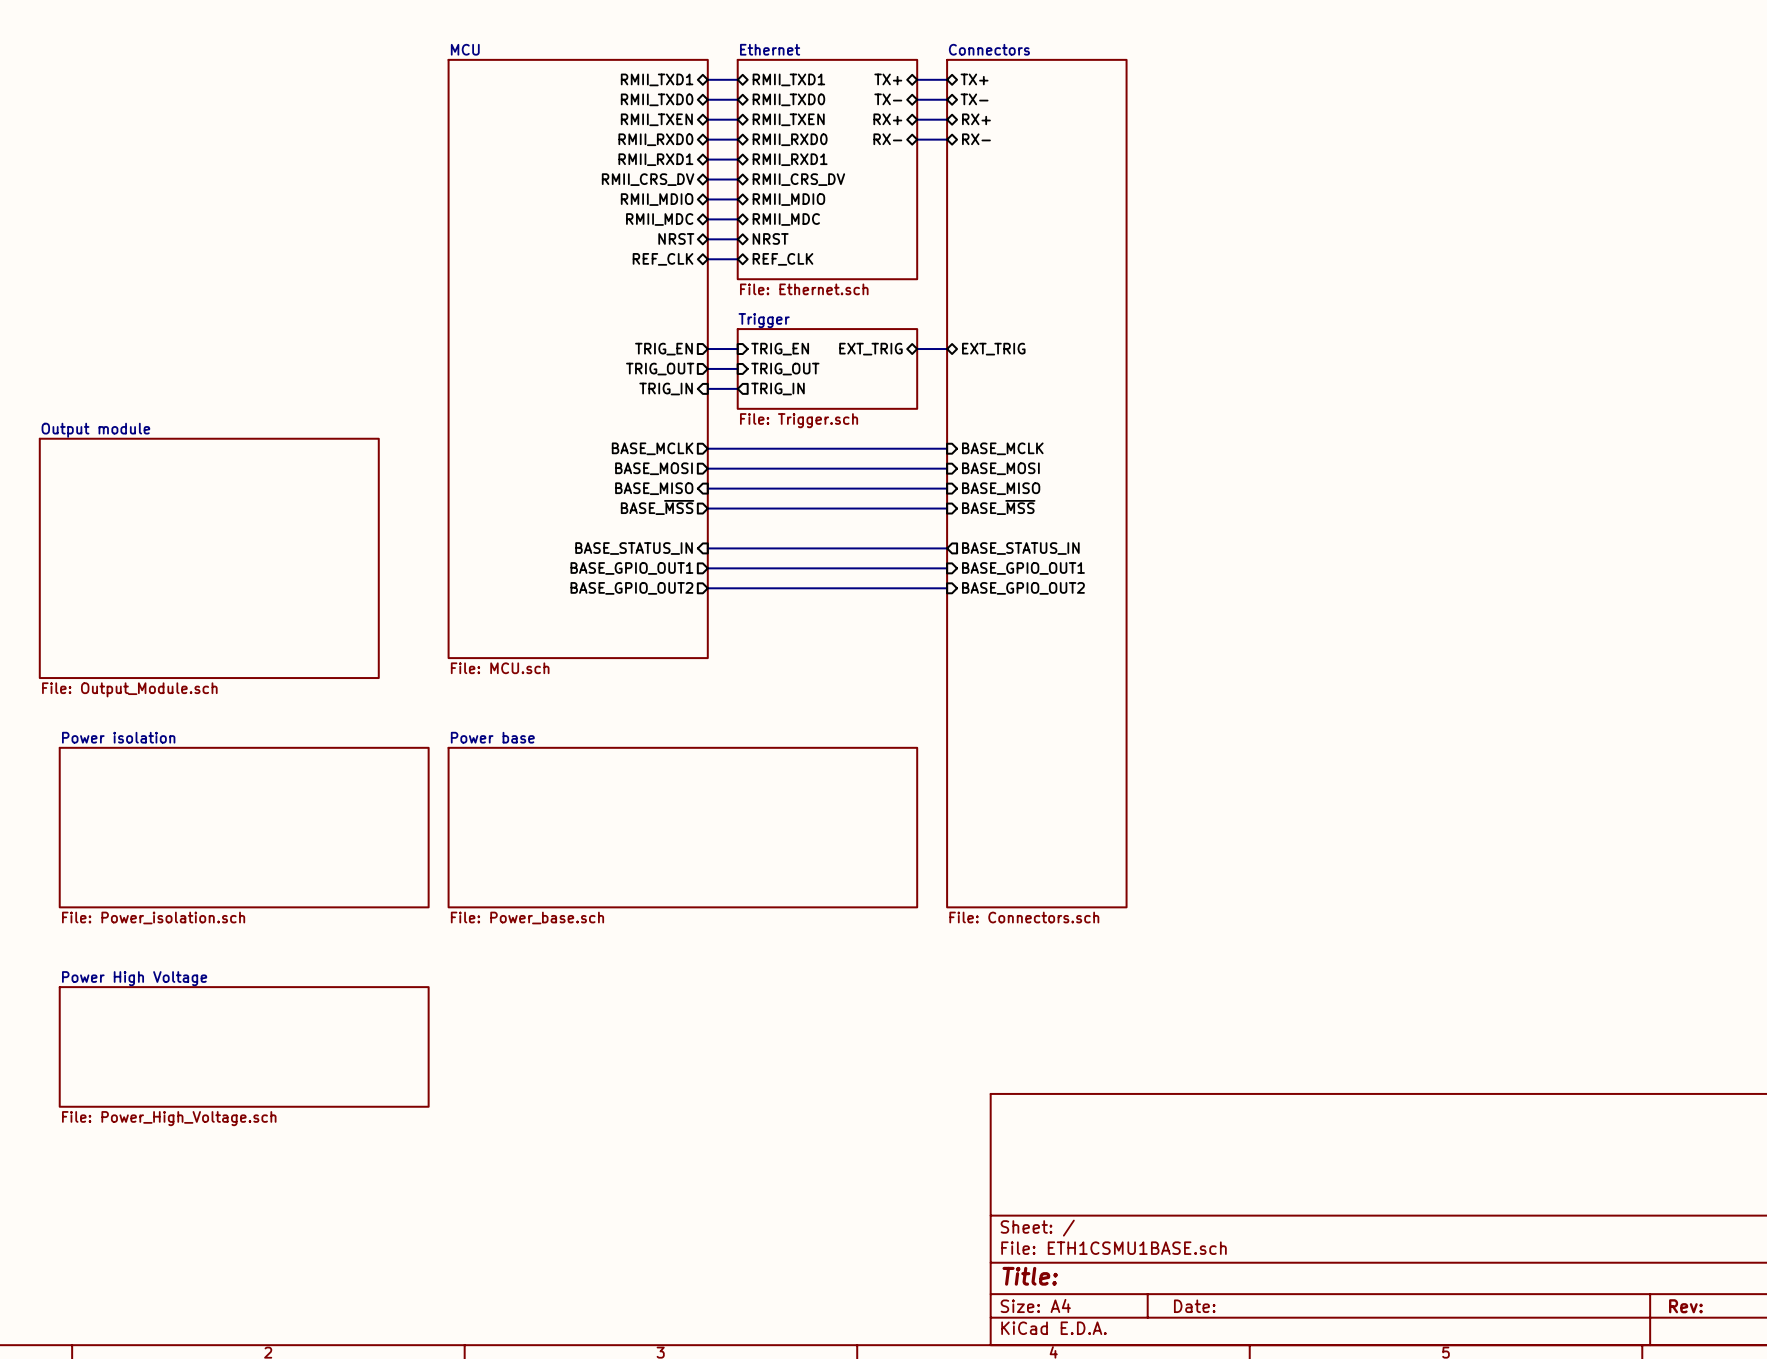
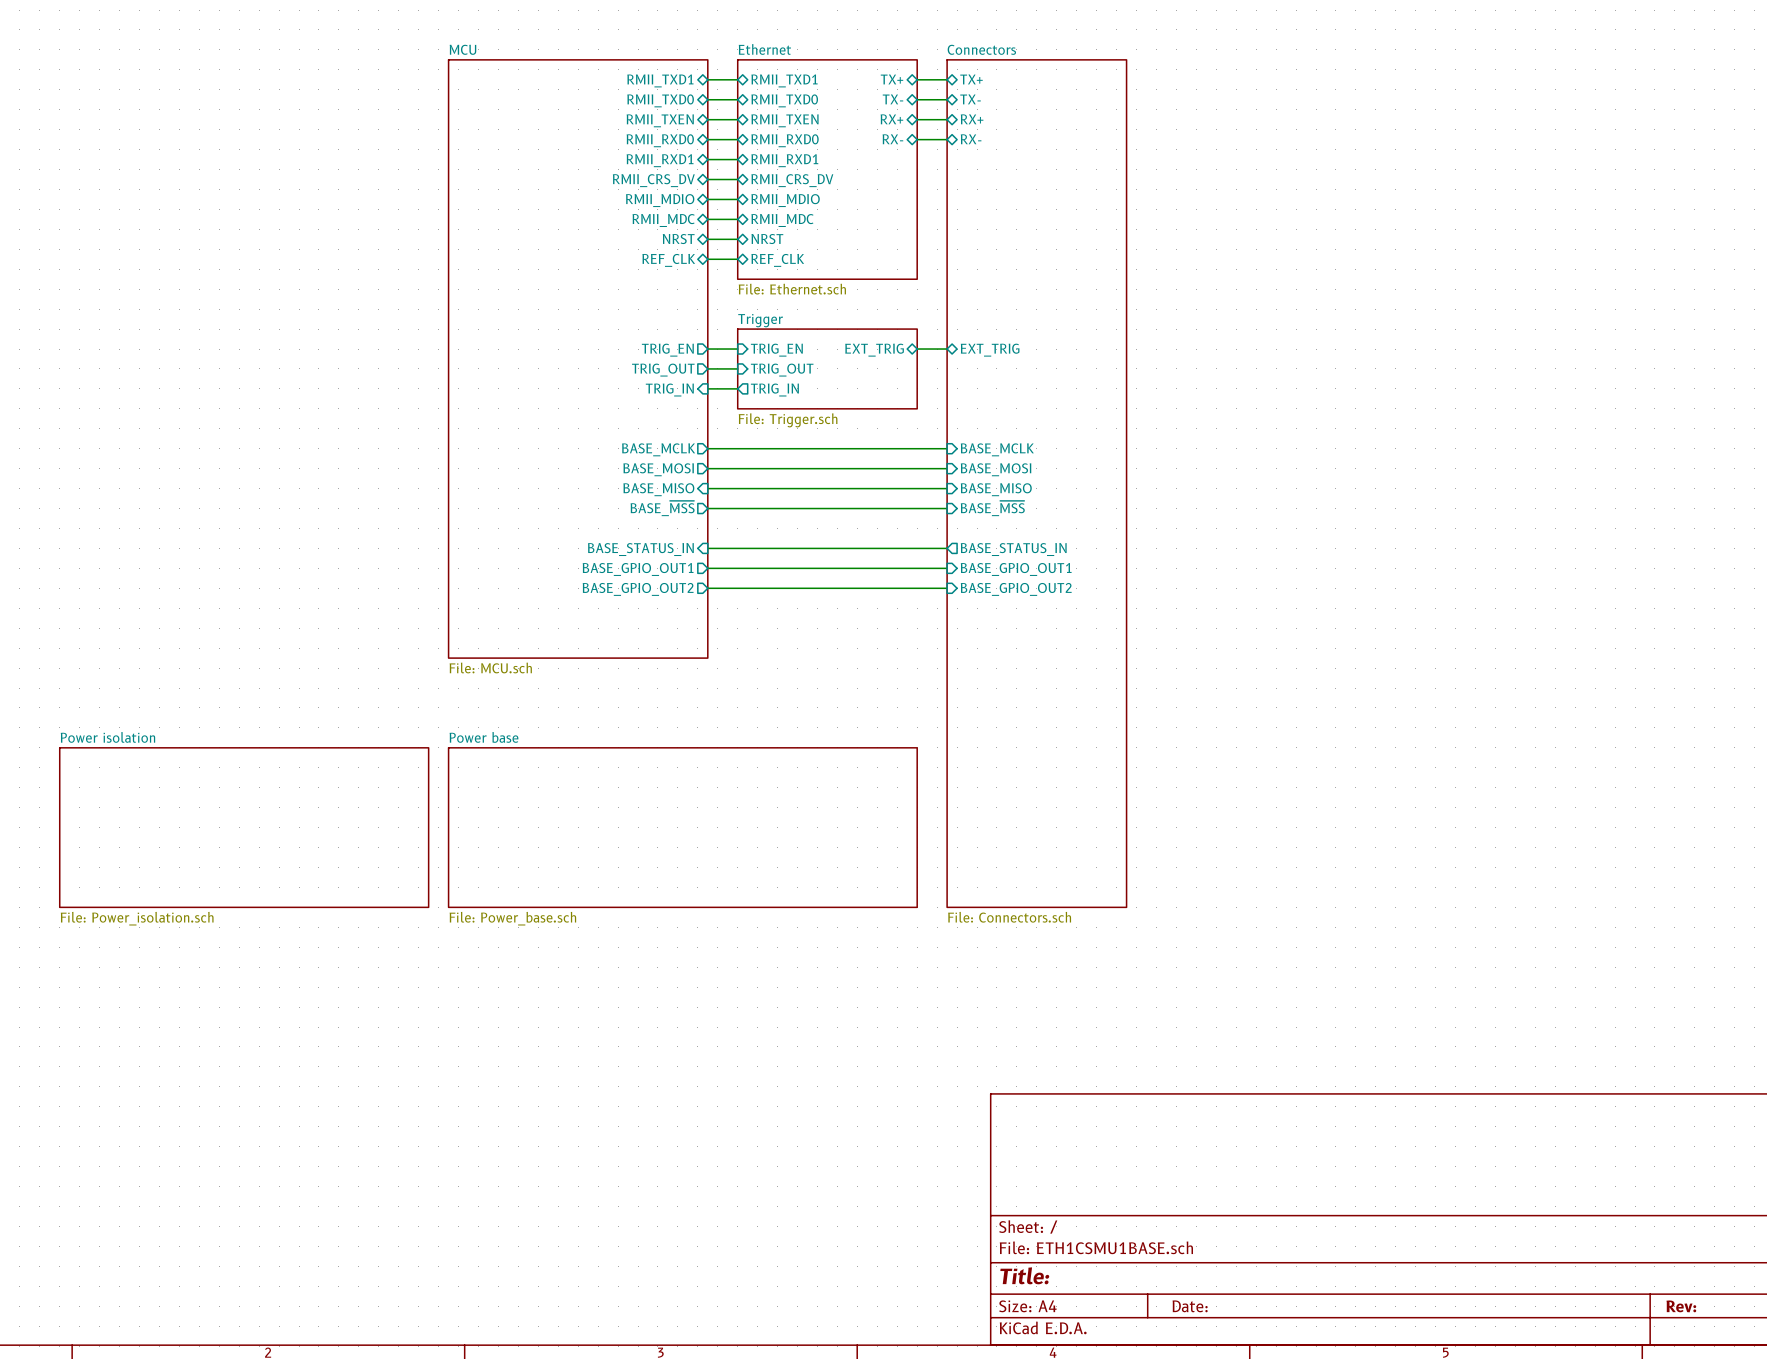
sheet Output module: File: Output_Module.sch (209, 558) -> none
sheet Power High Voltage: File: Power_High_Voltage.sch (244, 1046) -> none

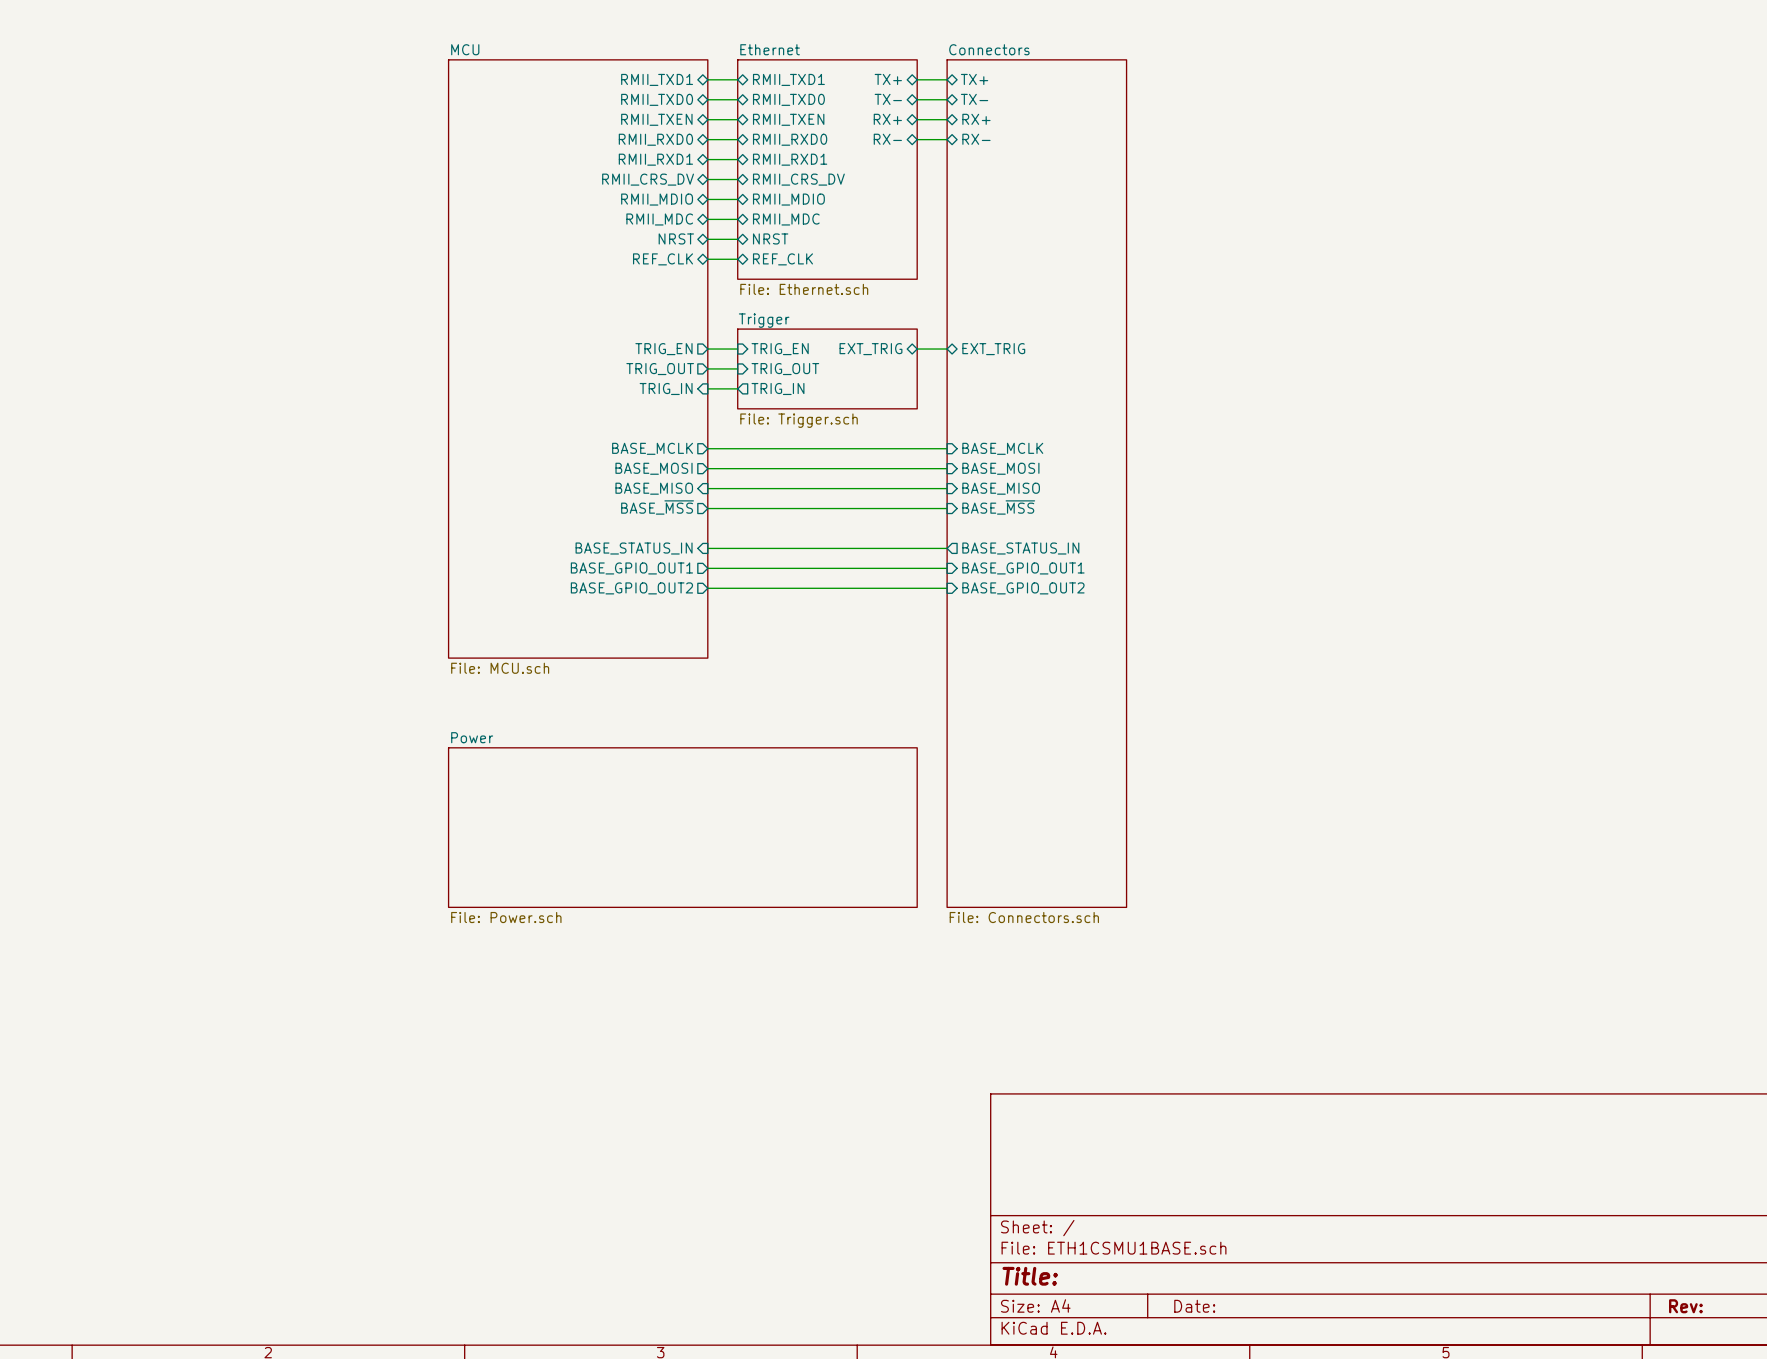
sheet Power base name: Power base (483, 737) -> Power (472, 737)
sheet Power isolation: File: Power_isolation.sch (244, 827) -> none
sheet Power base value: File: Power_base.sch (512, 918) -> File: Power.sch (506, 917)

